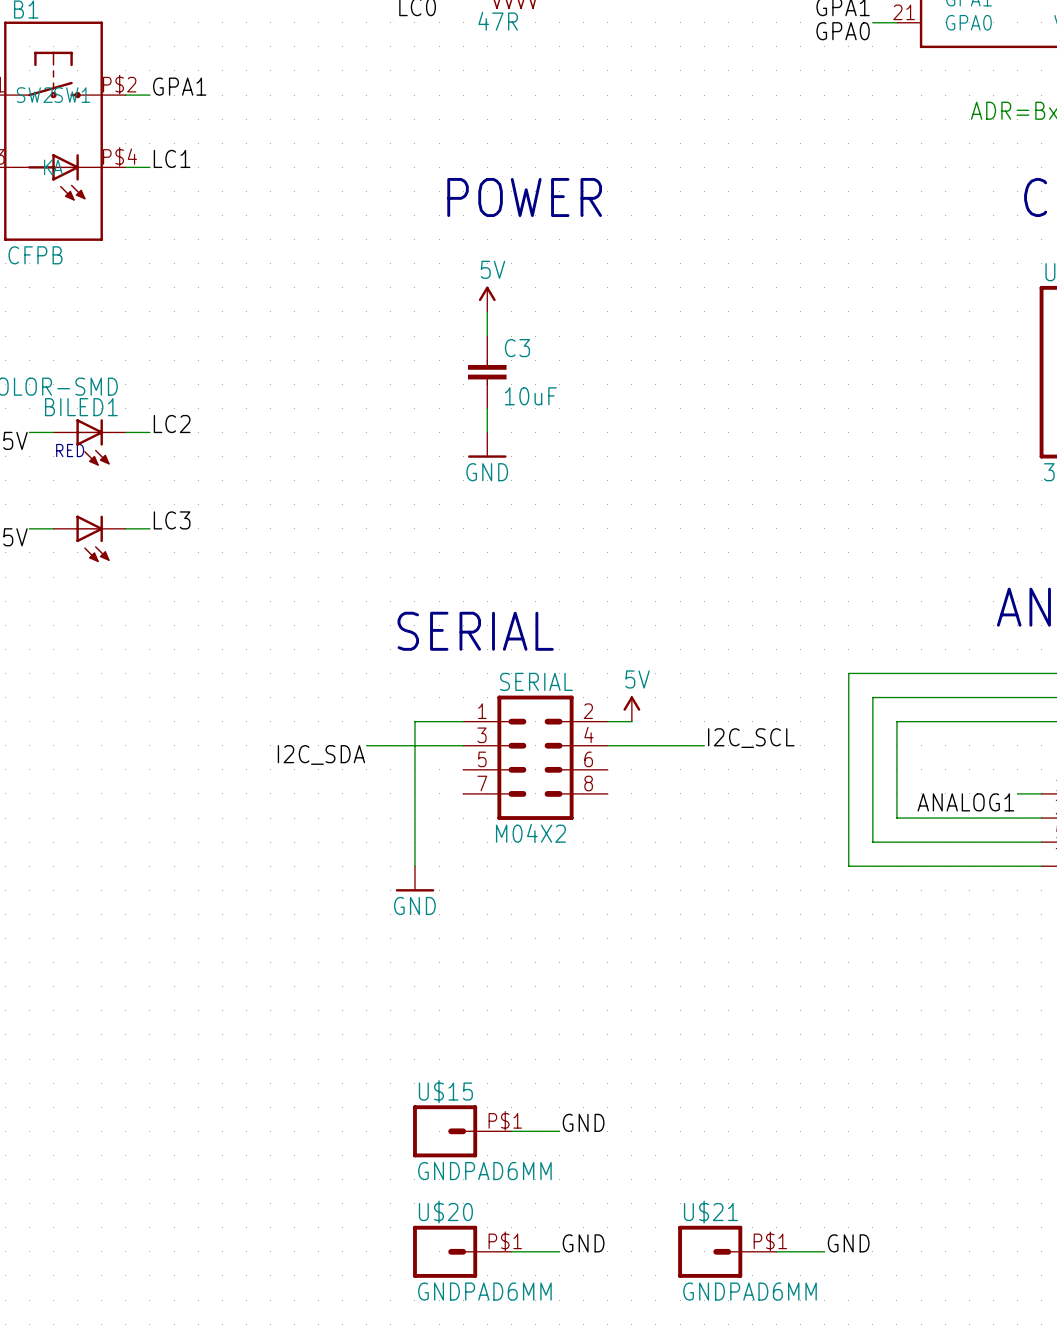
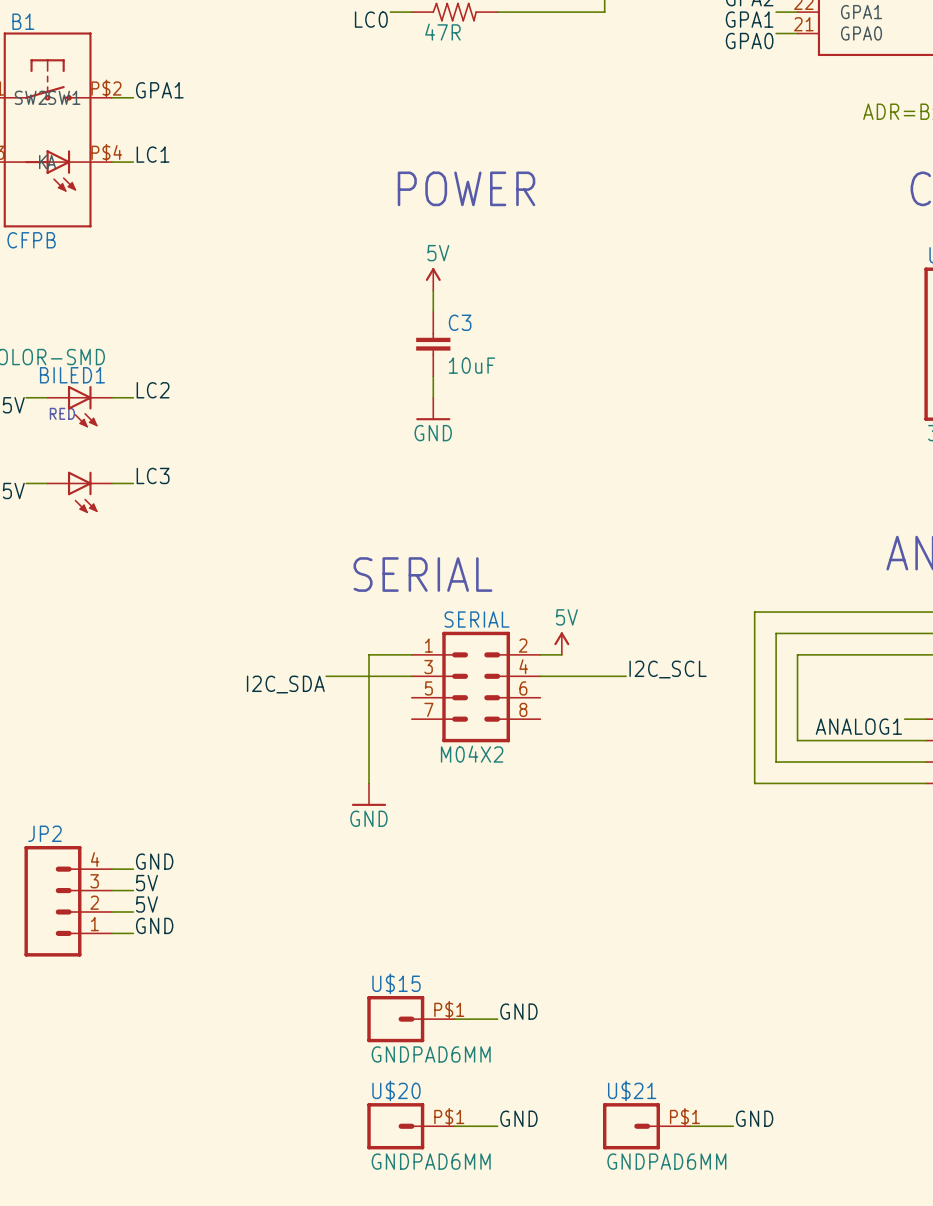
label: none -> GND (154, 861)
wire: none -> (111, 869) (133, 869)
label: none -> 5V (146, 883)
wire: none -> (111, 890) (133, 890)
JP2: none -> (68, 901)
label: none -> 5V (146, 904)
wire: none -> (111, 911) (133, 911)
label: none -> GND (154, 925)
wire: none -> (111, 933) (133, 933)

